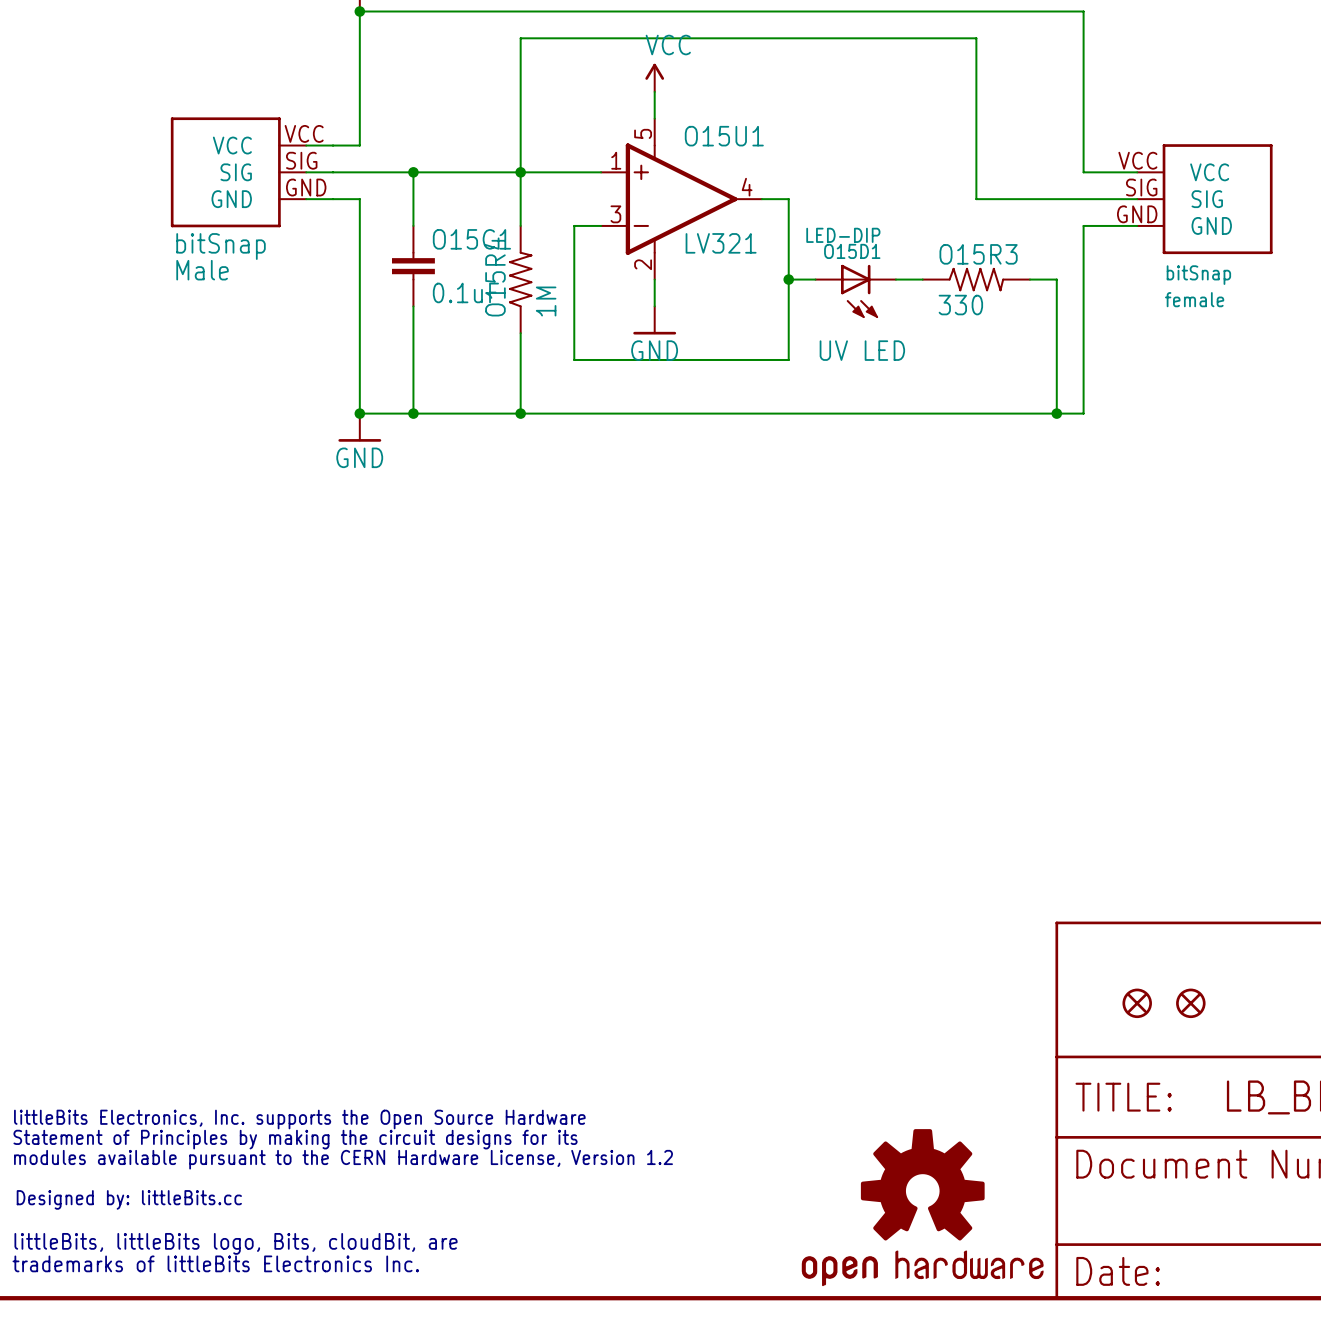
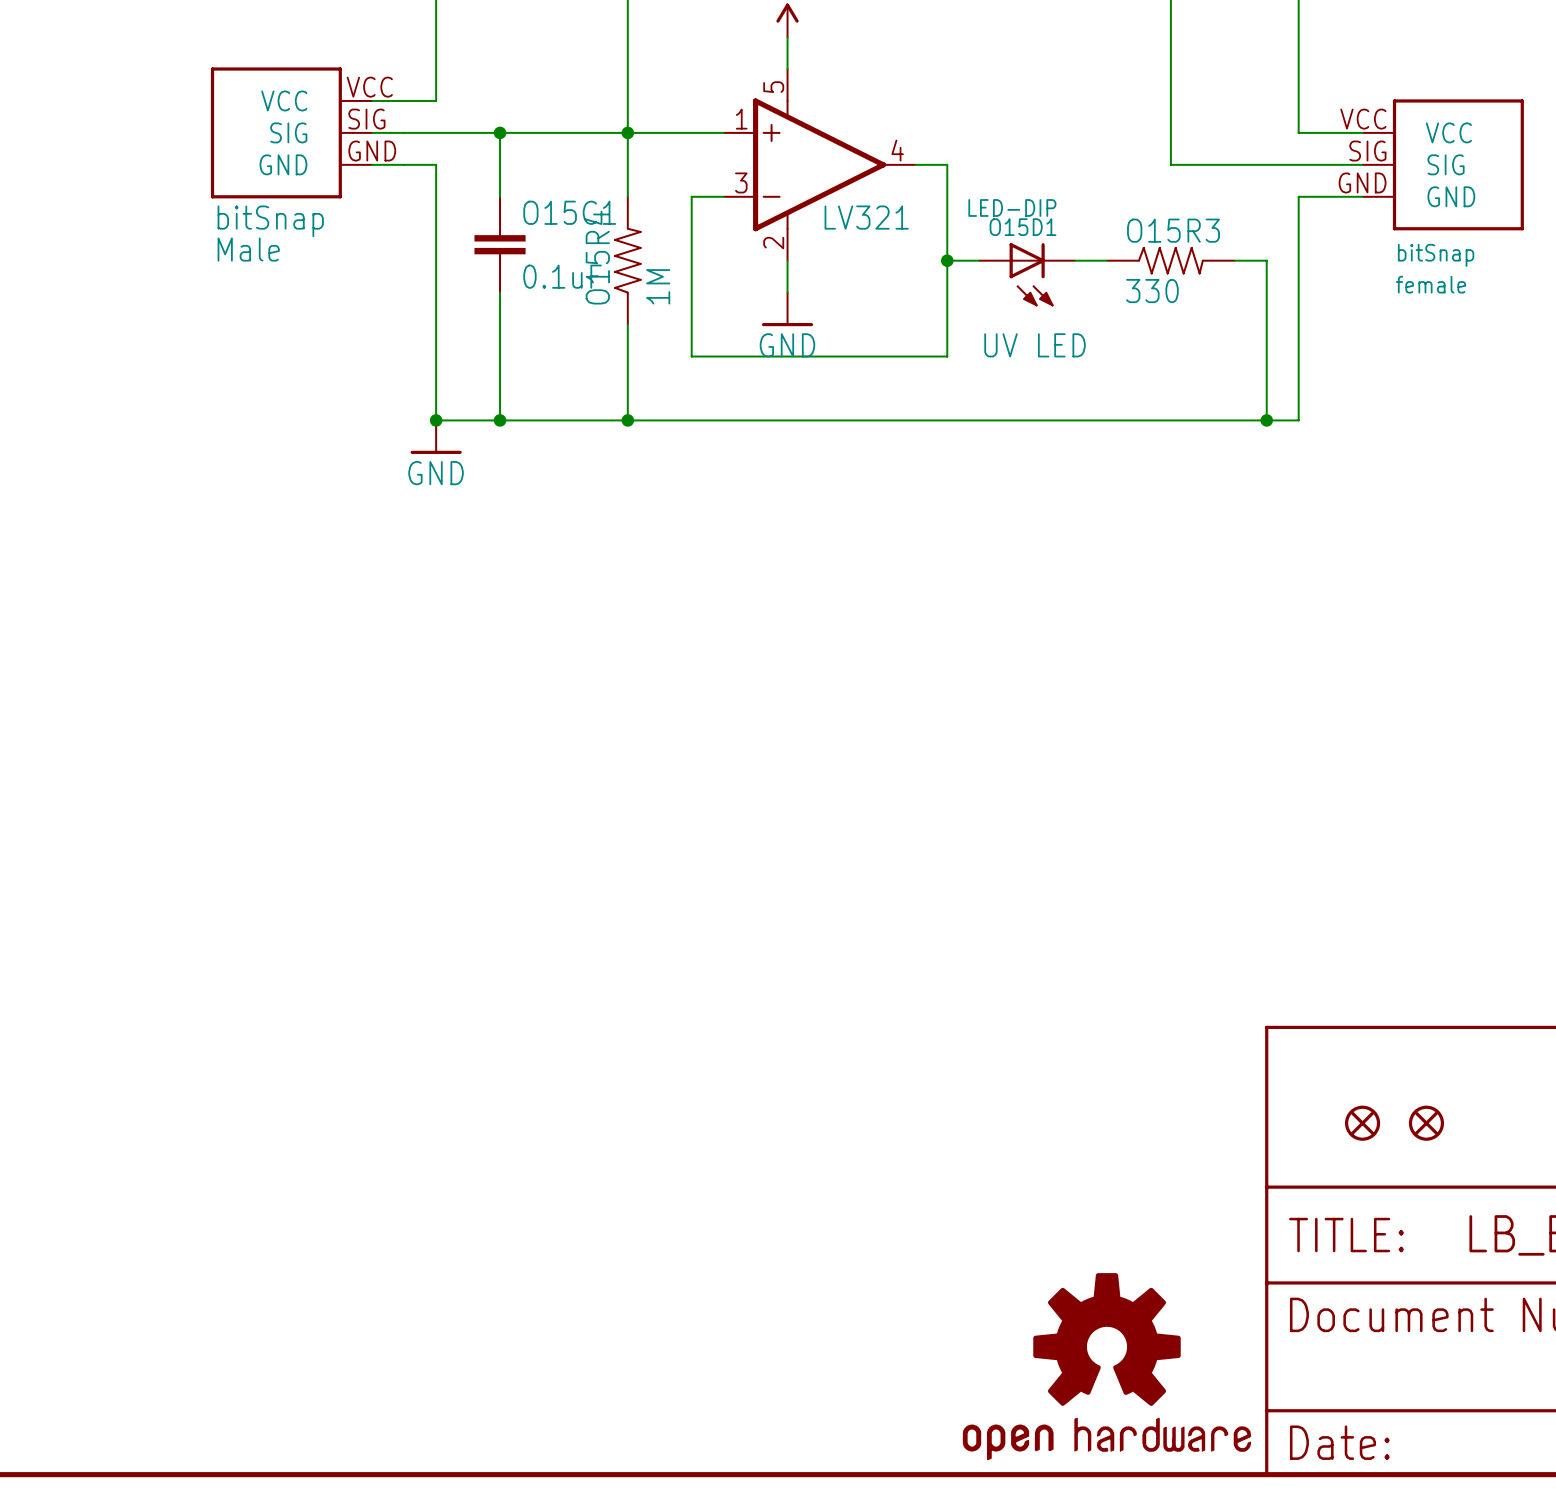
O15U1 name: O15U1 (724, 136) -> none
part: (342, 1191) -> none

